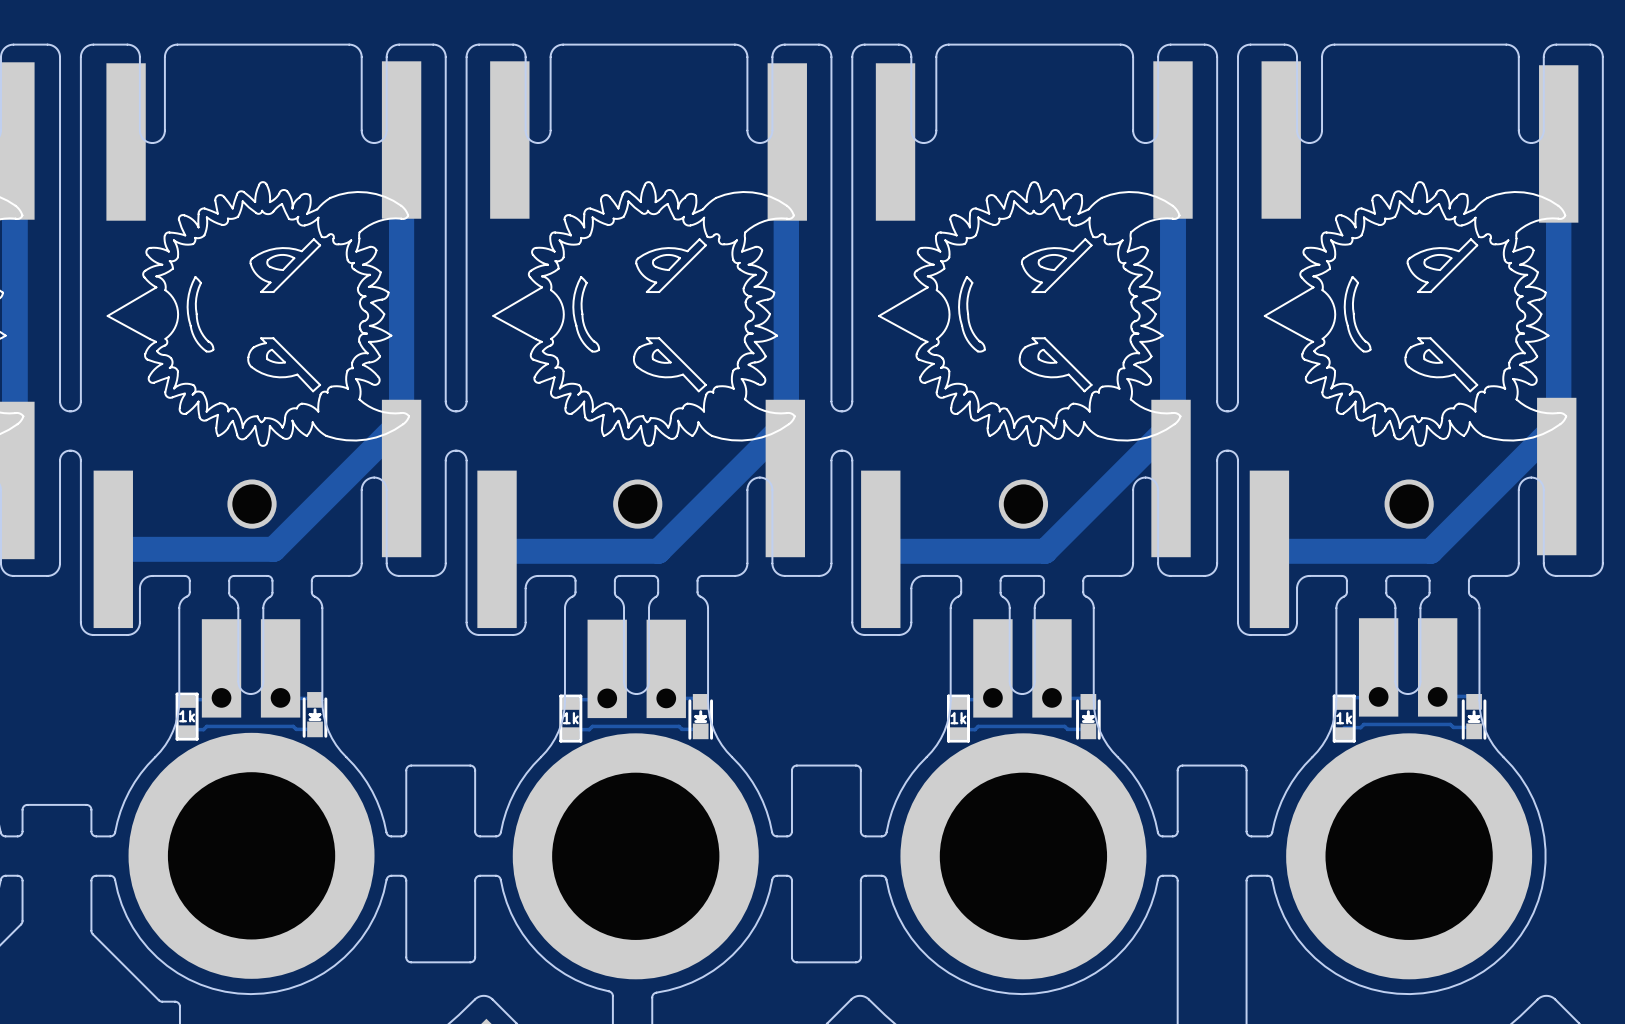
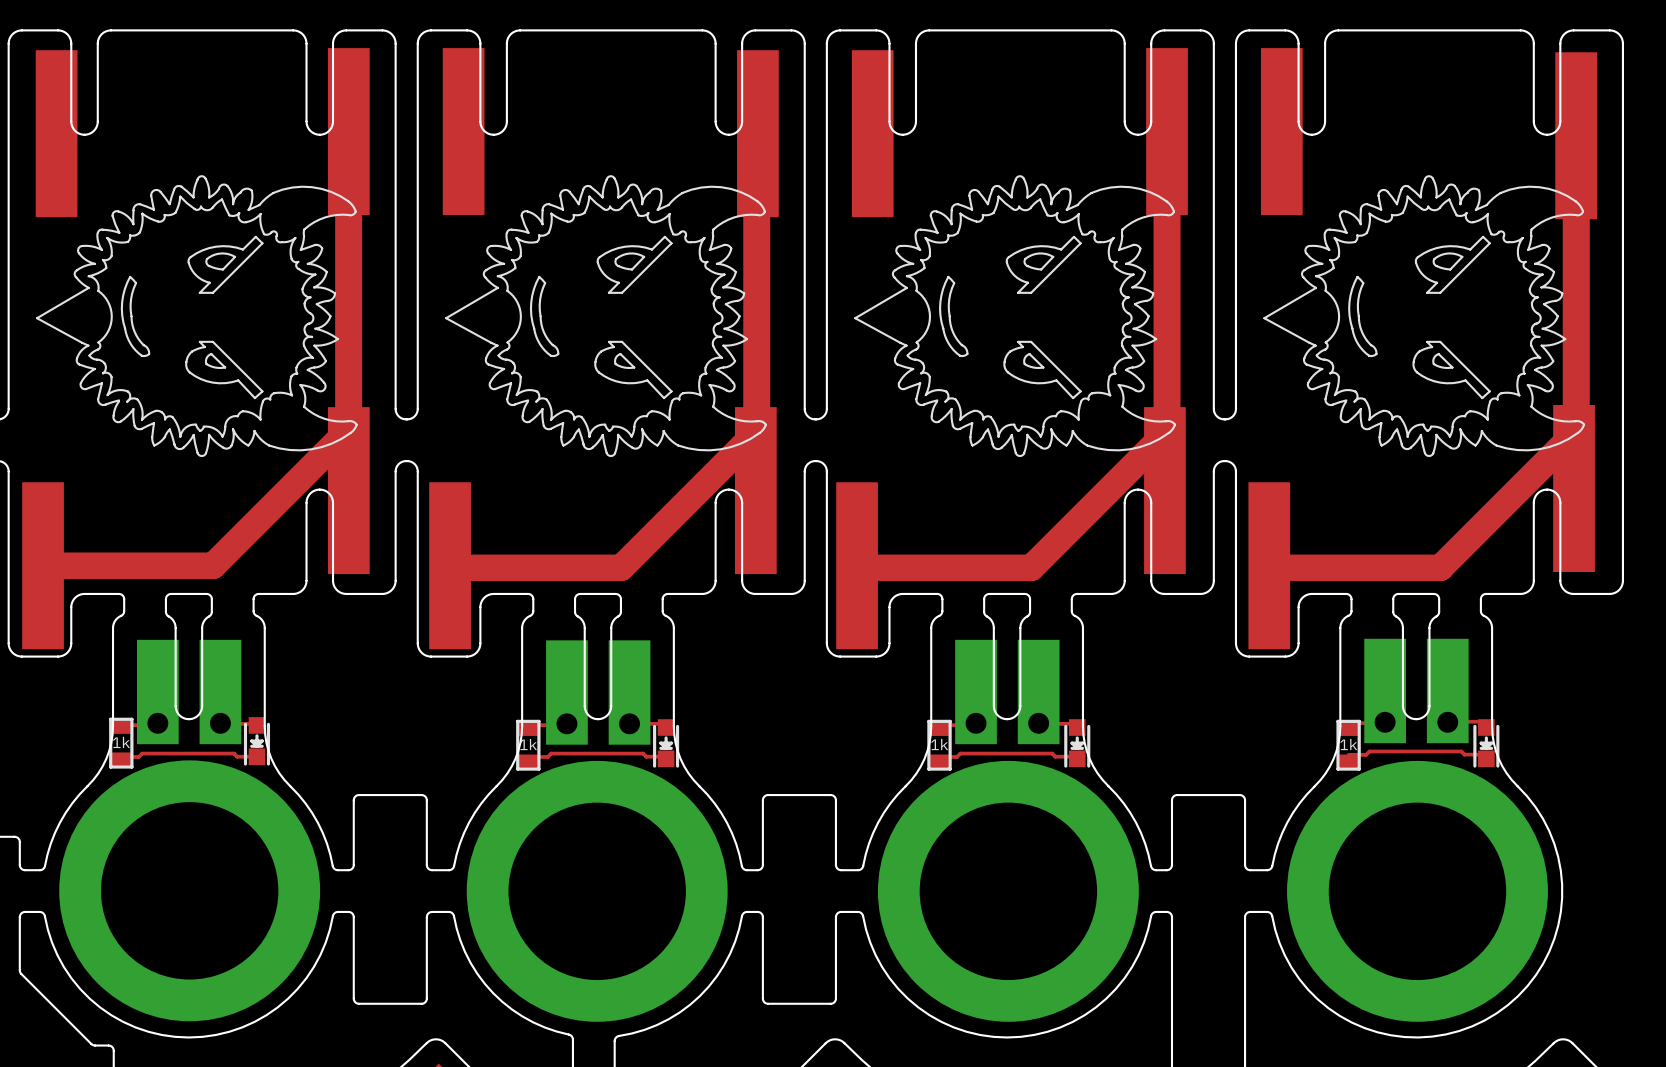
part: (252, 504) -> none
part: (637, 504) -> none
part: (1023, 504) -> none
part: (1409, 504) -> none

